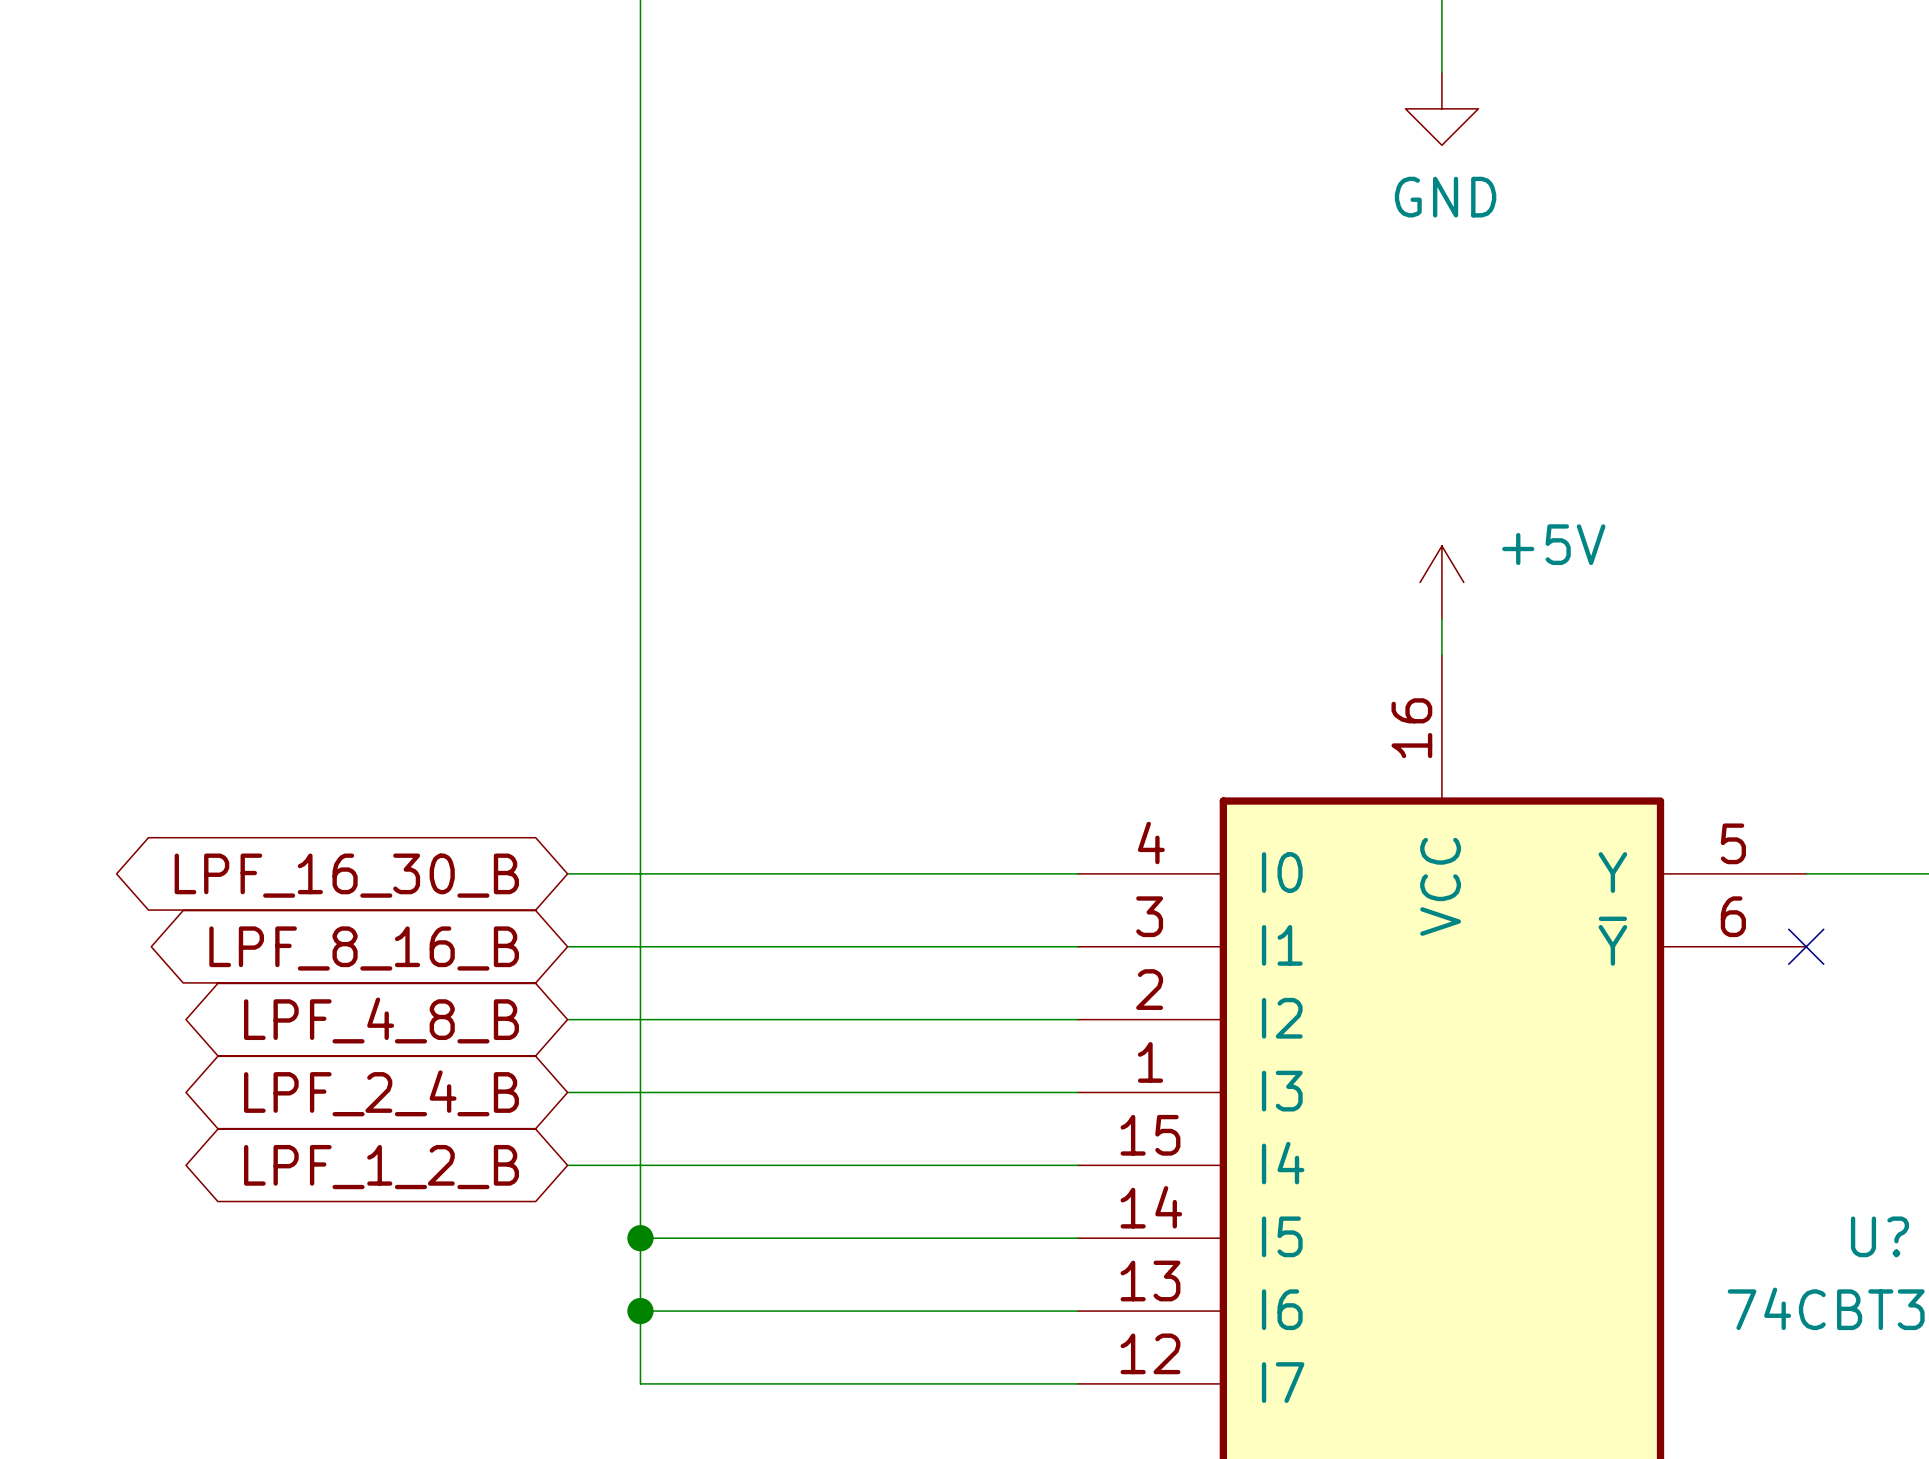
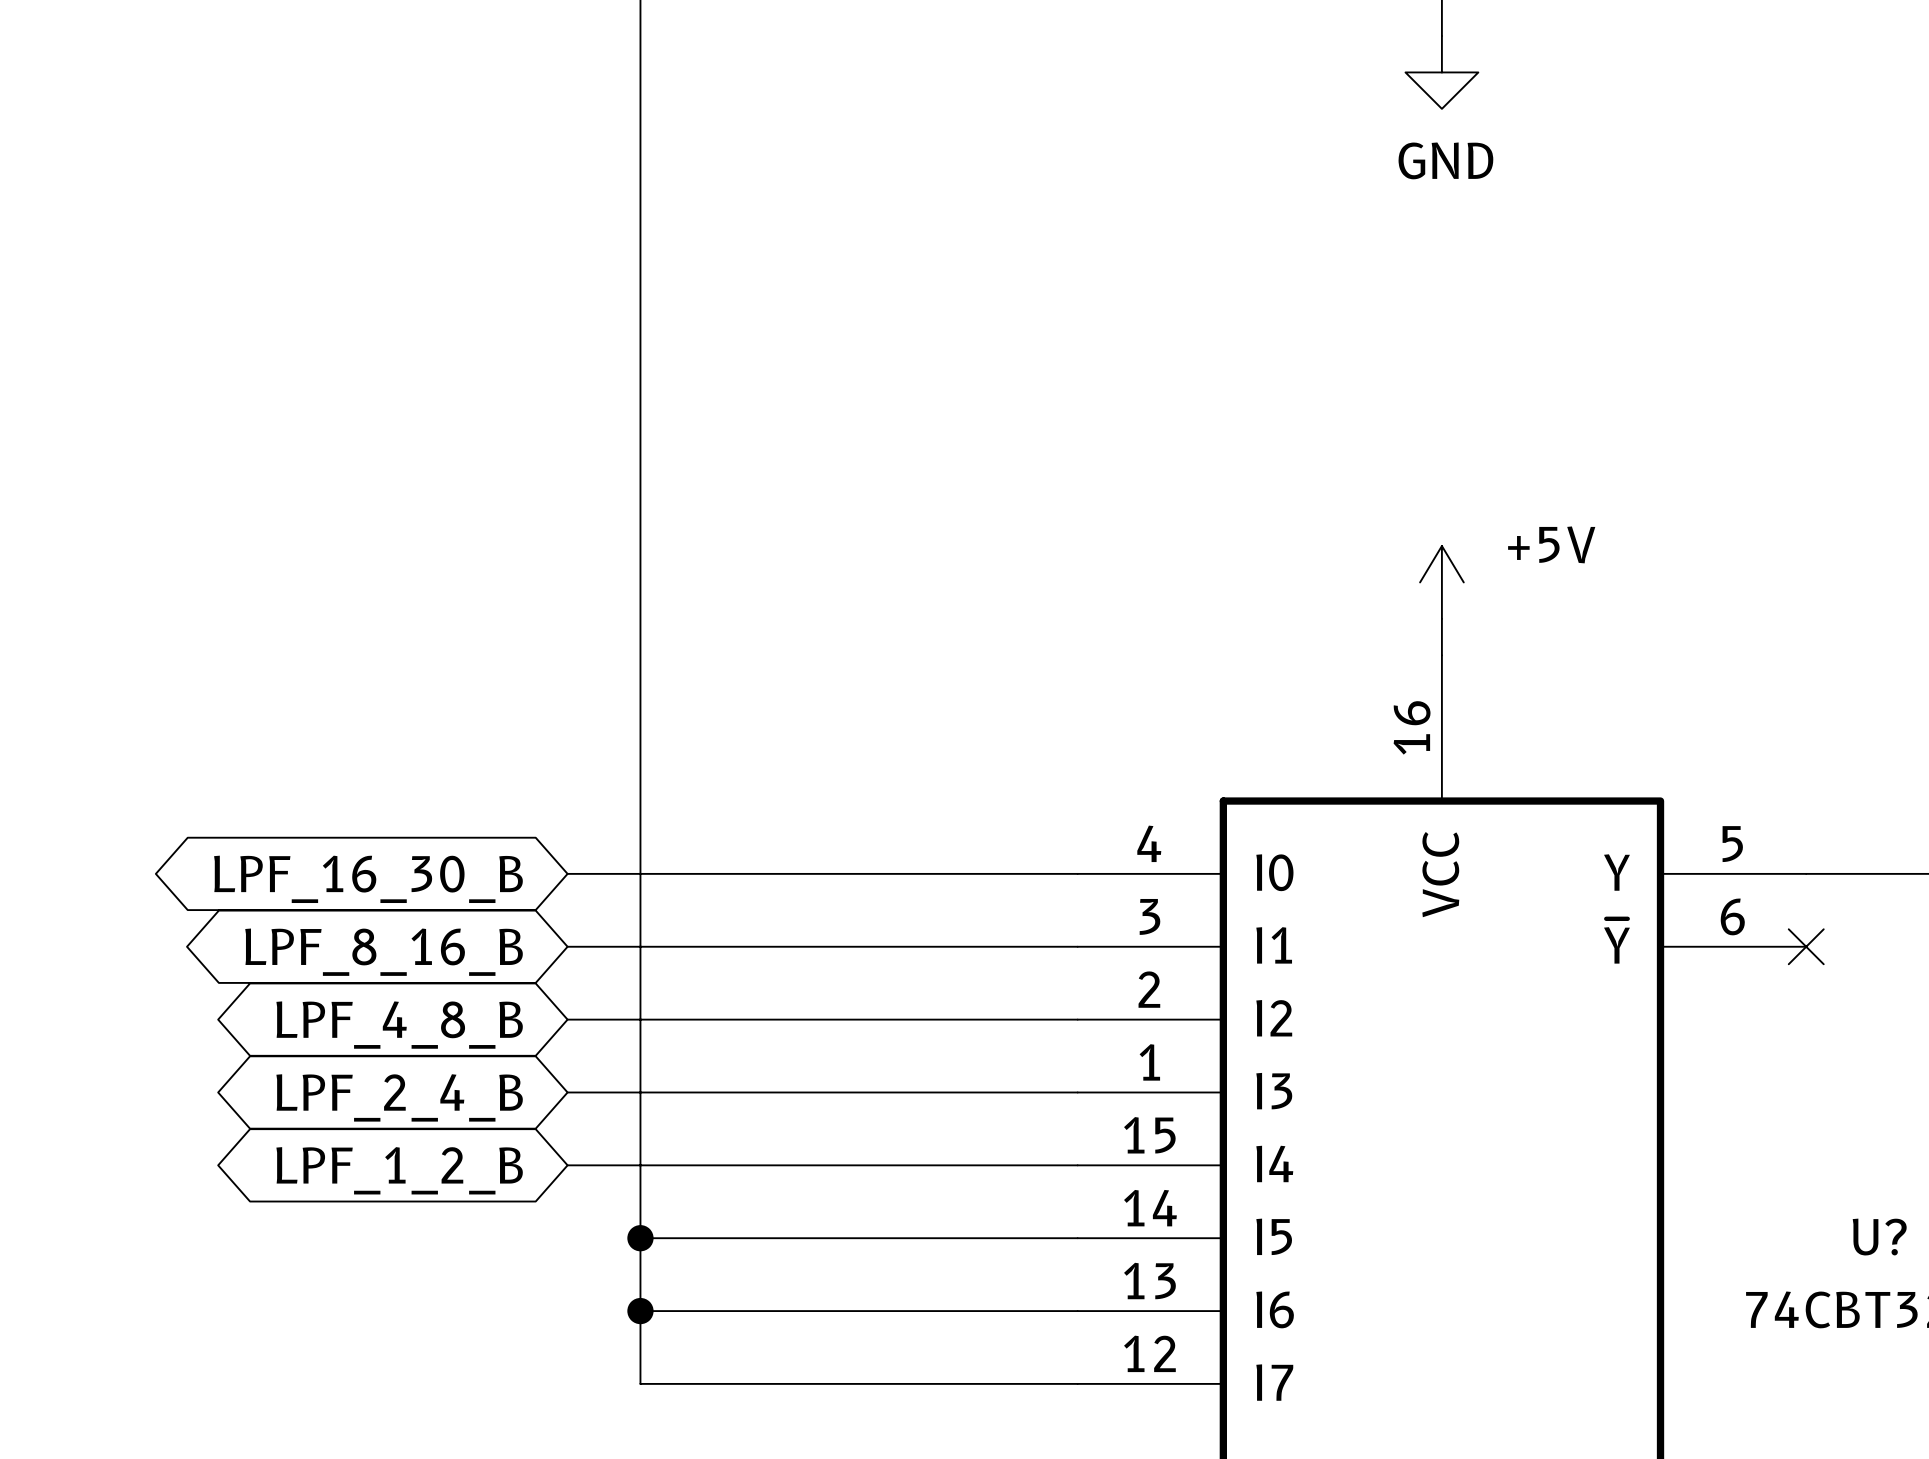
power symbol position: GND (1441, 108) -> GND (1441, 72)

